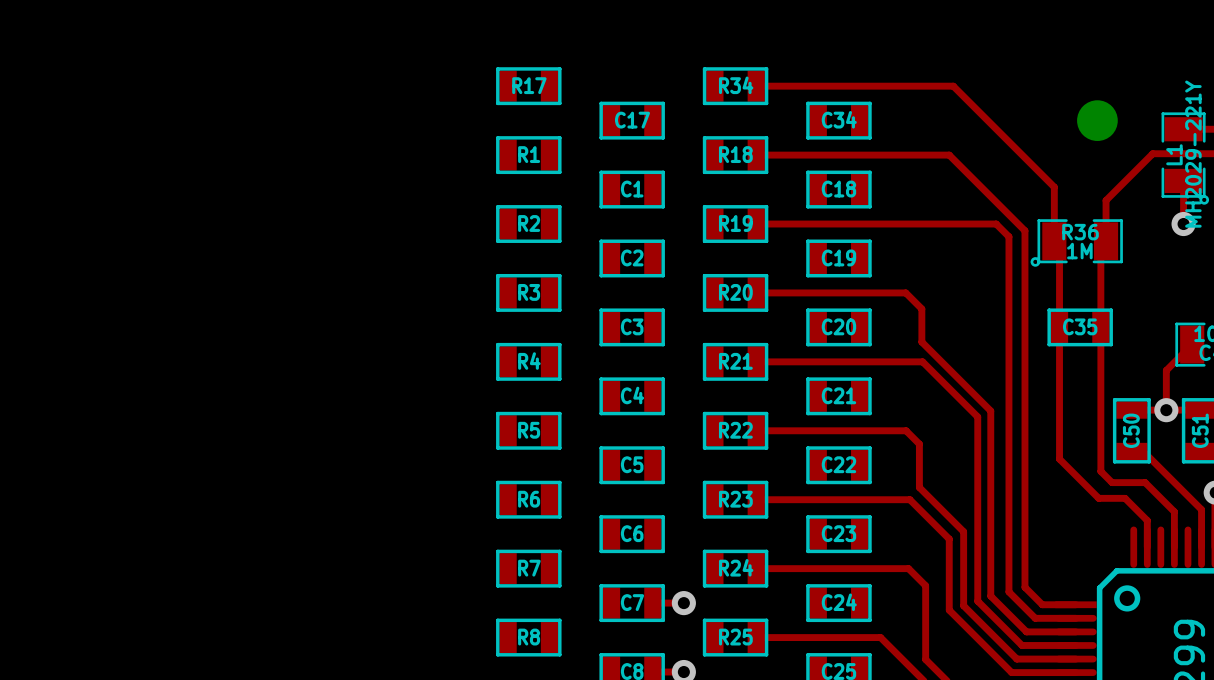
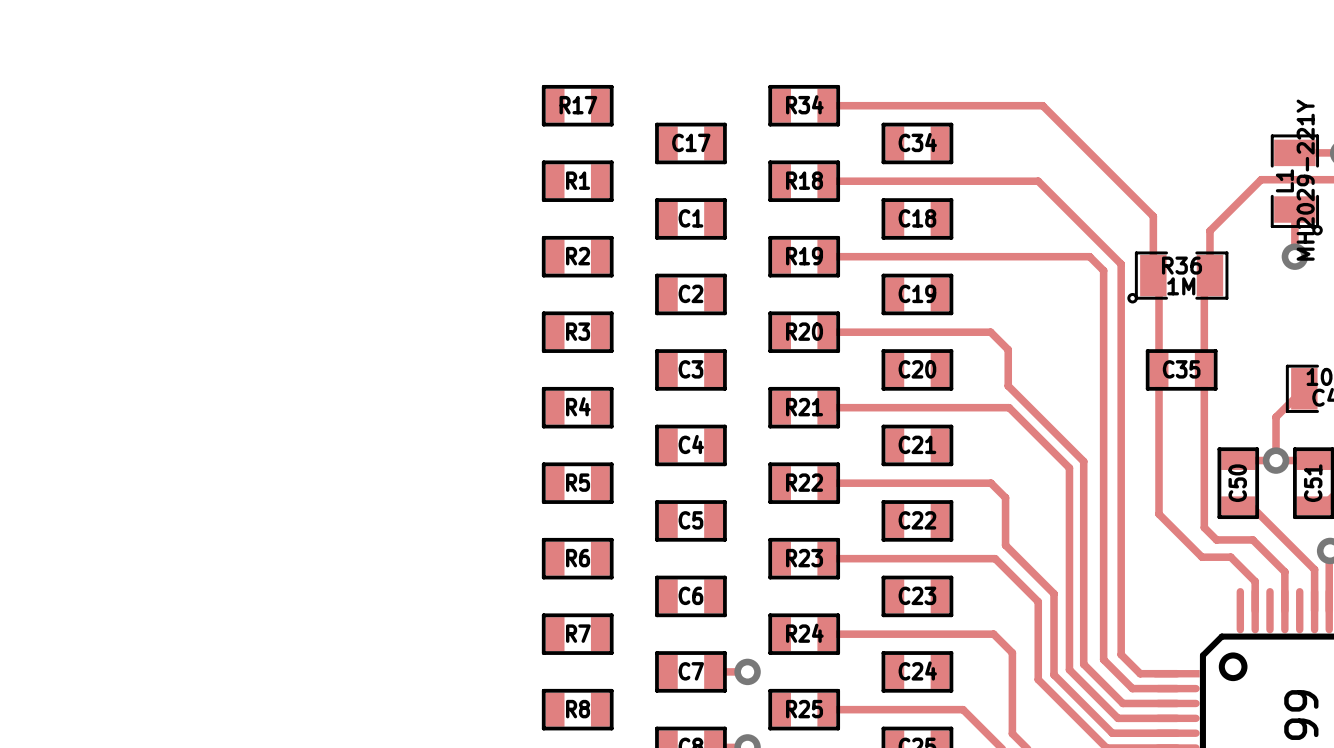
part: (1097, 120) -> none

